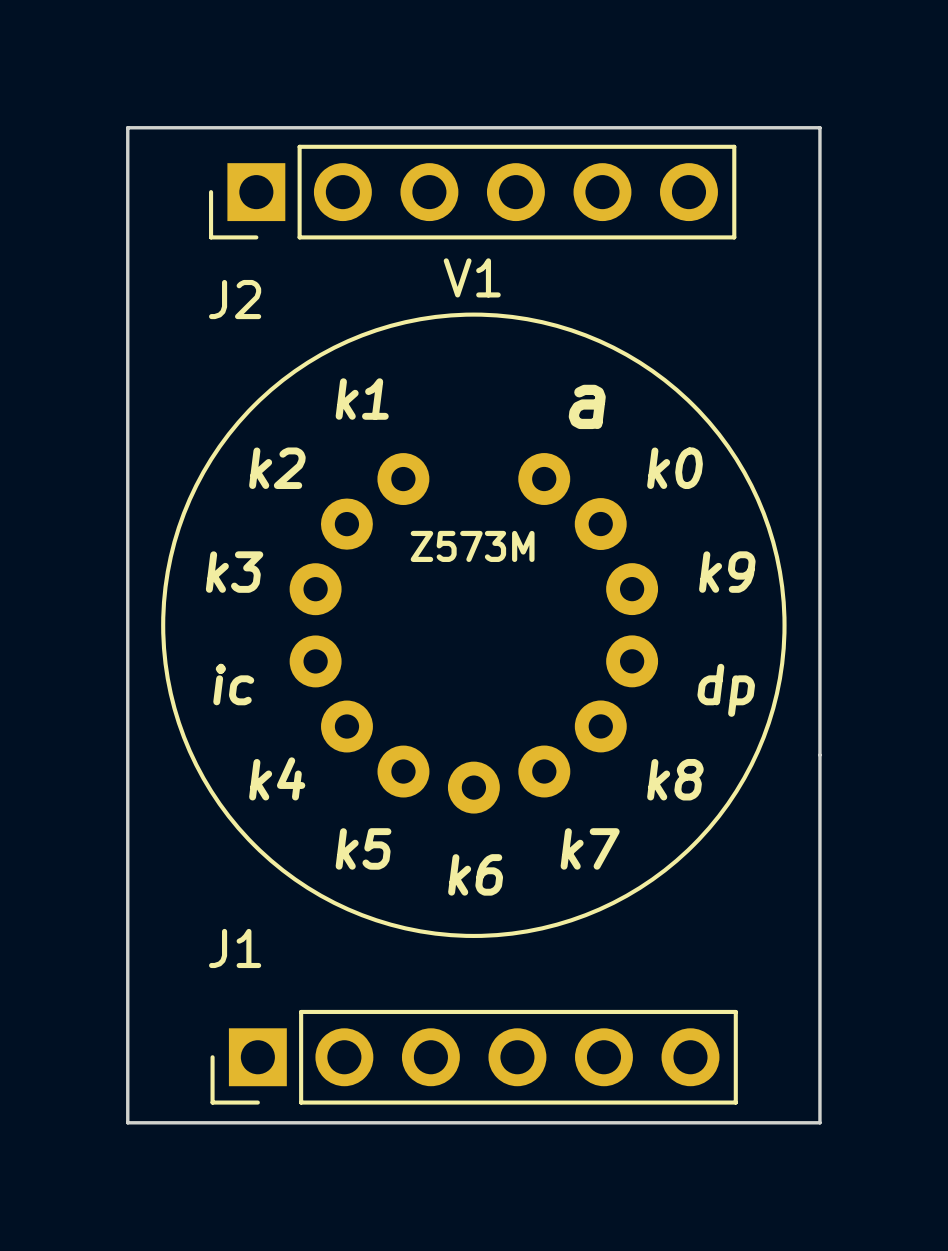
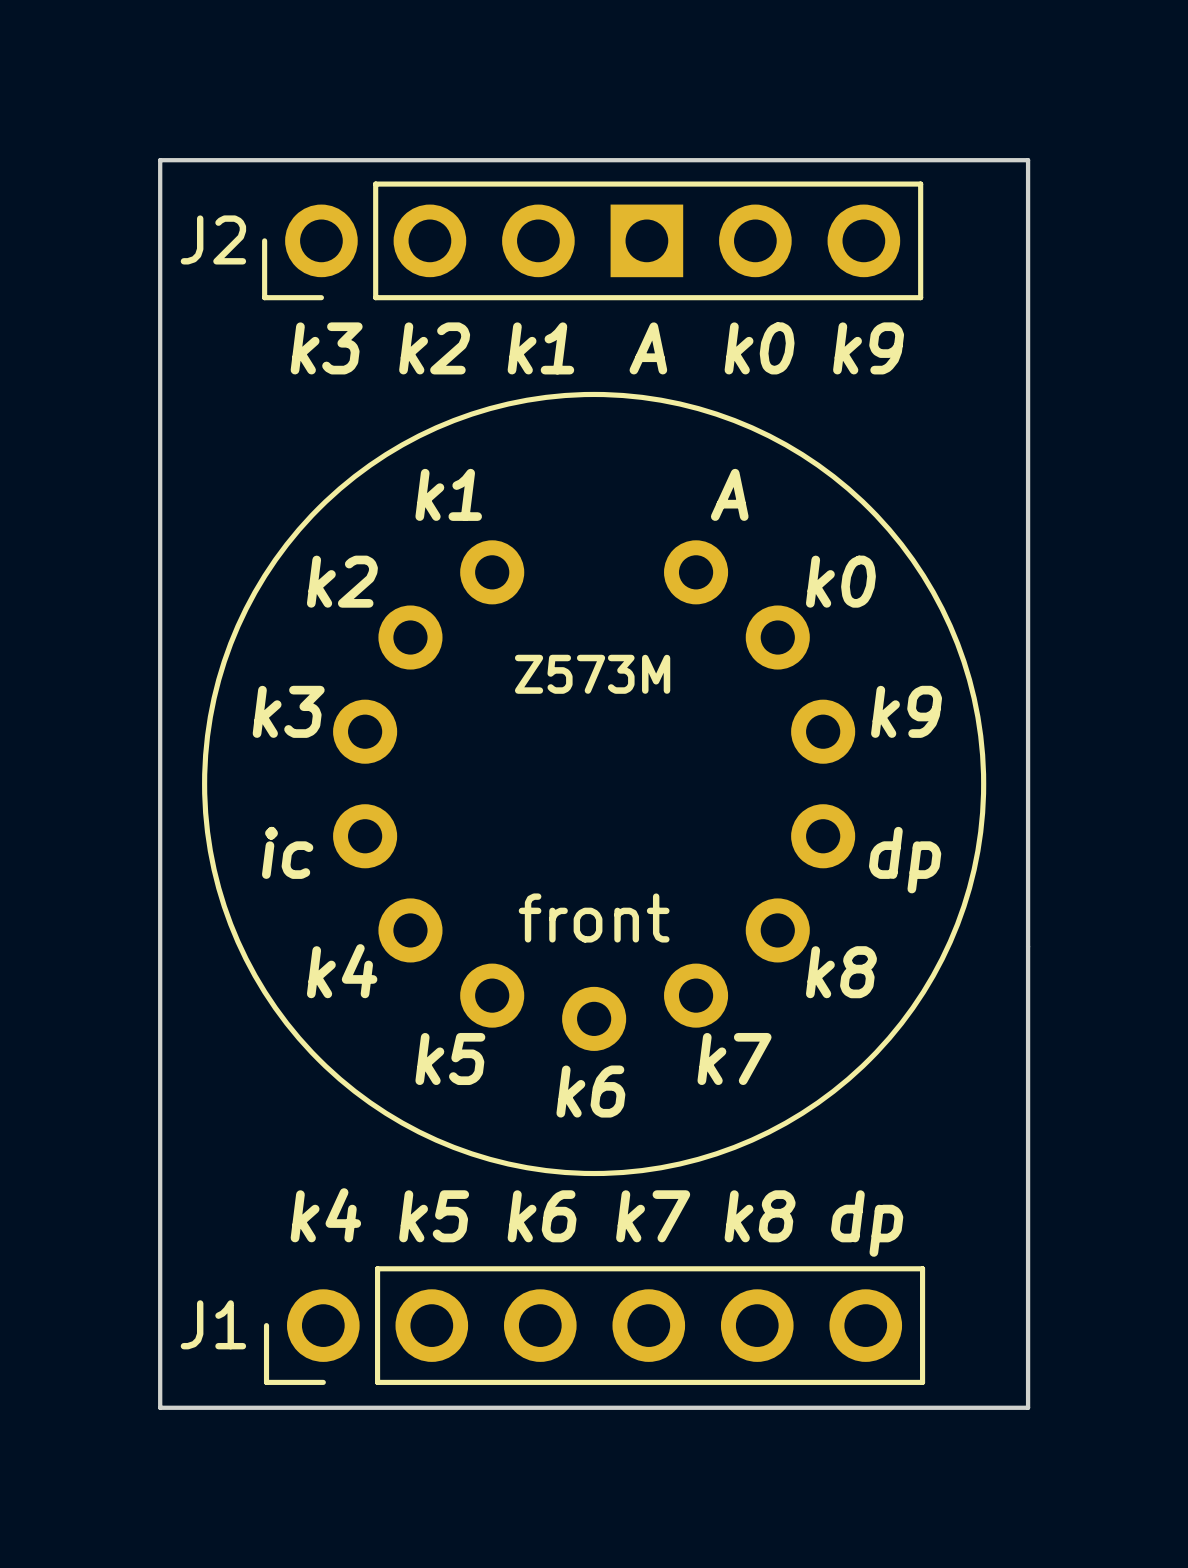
J2 footprint: [209, 144, 737, 240] -> [262, 181, 924, 301]
text: none -> k3 (326, 348)
text: none -> k2 (434, 348)
text: none -> k1 (540, 348)
text: none -> A (648, 348)
text: none -> k0 (759, 348)
text: none -> k9 (868, 348)
J2 name position: J2 (235, 299) -> J2 (213, 239)
V1: (473, 625) -> none
part: none -> (594, 783)
text: none -> front (594, 917)
J1 name position: J1 (235, 948) -> J1 (213, 1324)
text: none -> k4 (325, 1215)
text: none -> k5 (434, 1216)
text: none -> k6 (542, 1216)
text: none -> k7 (653, 1216)
text: none -> k8 (760, 1216)
text: none -> dp (867, 1223)
J1 footprint: [210, 1009, 738, 1105] -> [263, 1266, 926, 1385]

